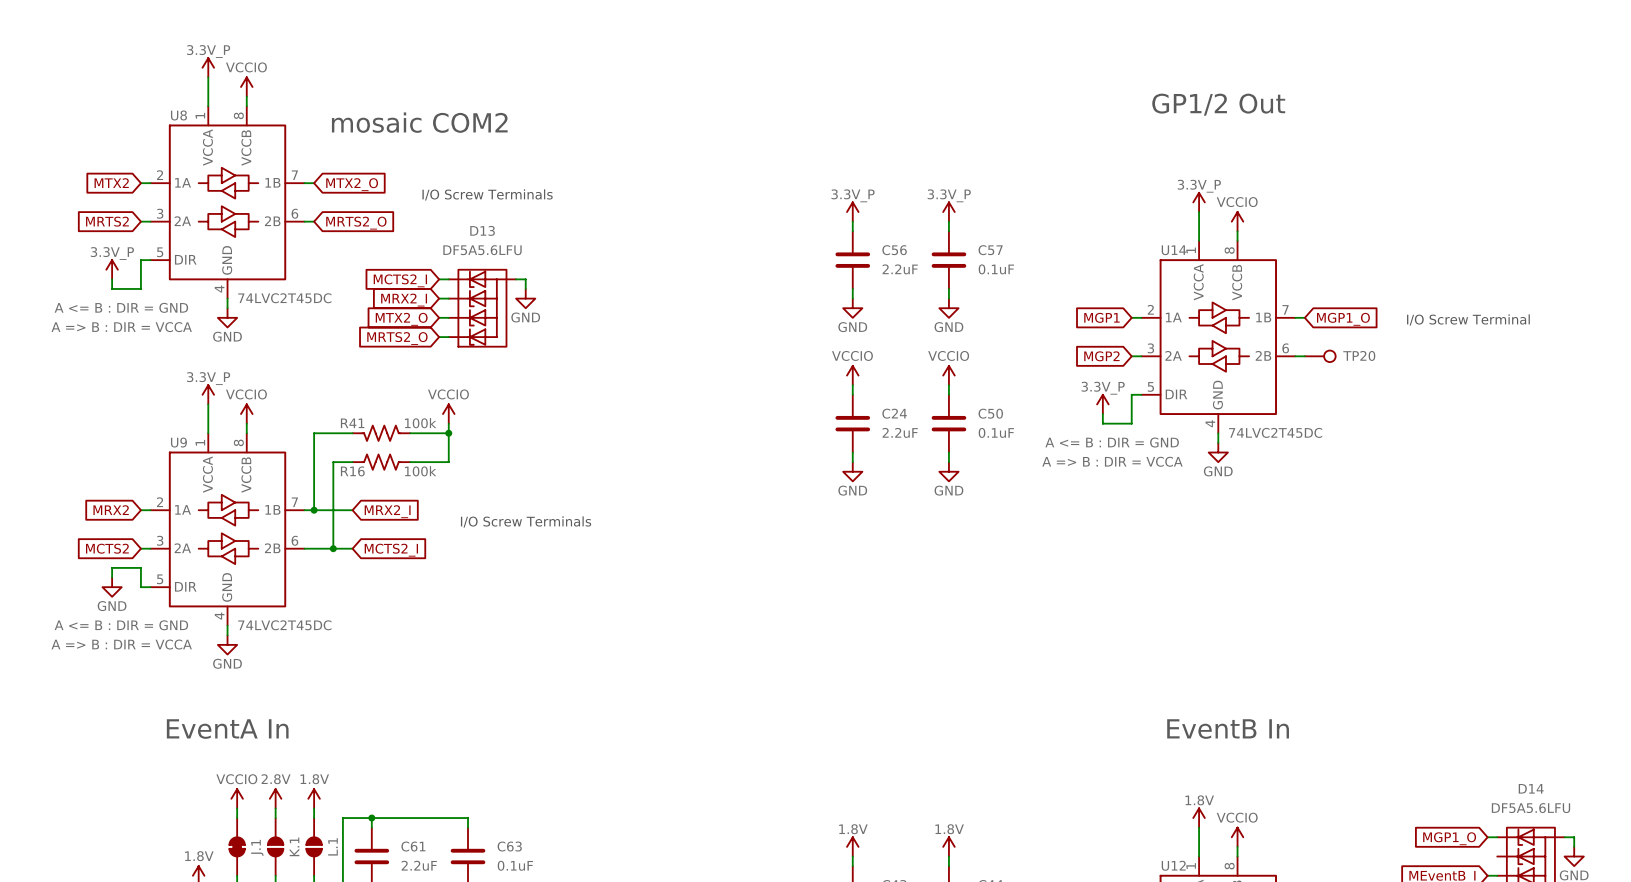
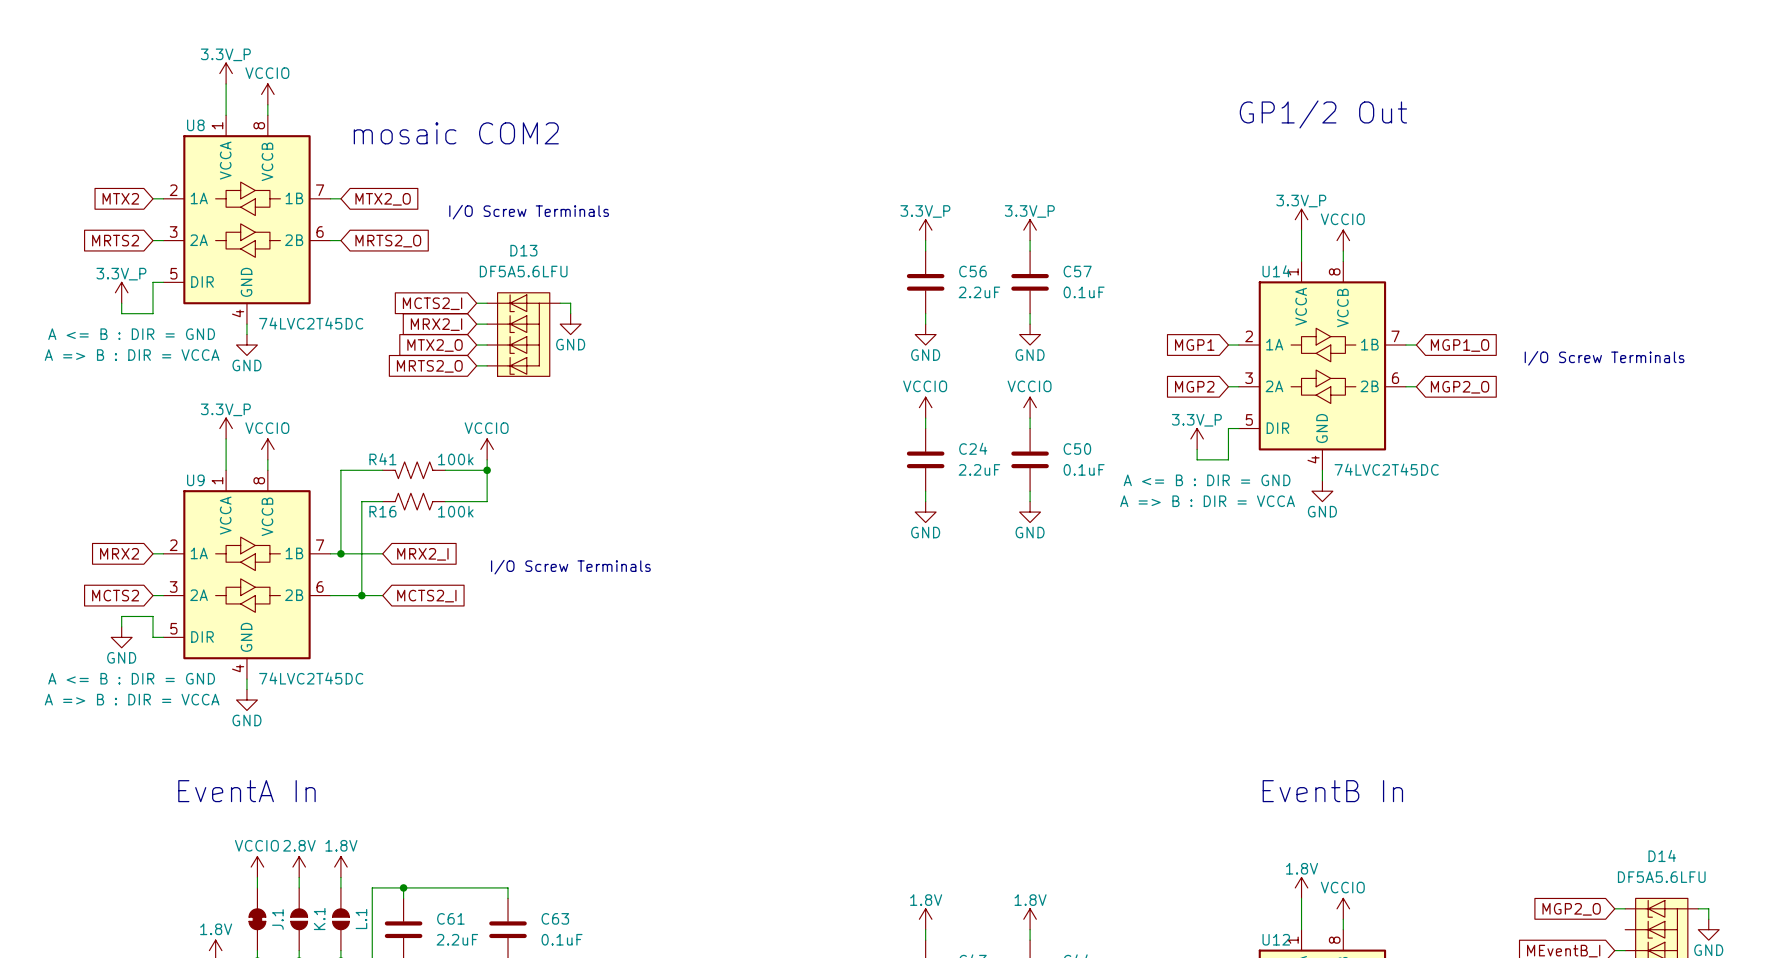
text: I/O Screw Terminal (1468, 319) -> I/O Screw Terminals (1604, 358)
TP20: (1320, 356) -> none
global label: none -> MGP2_O (1460, 387)
global label: MGP1_O (1449, 838) -> MGP2_O (1571, 909)

